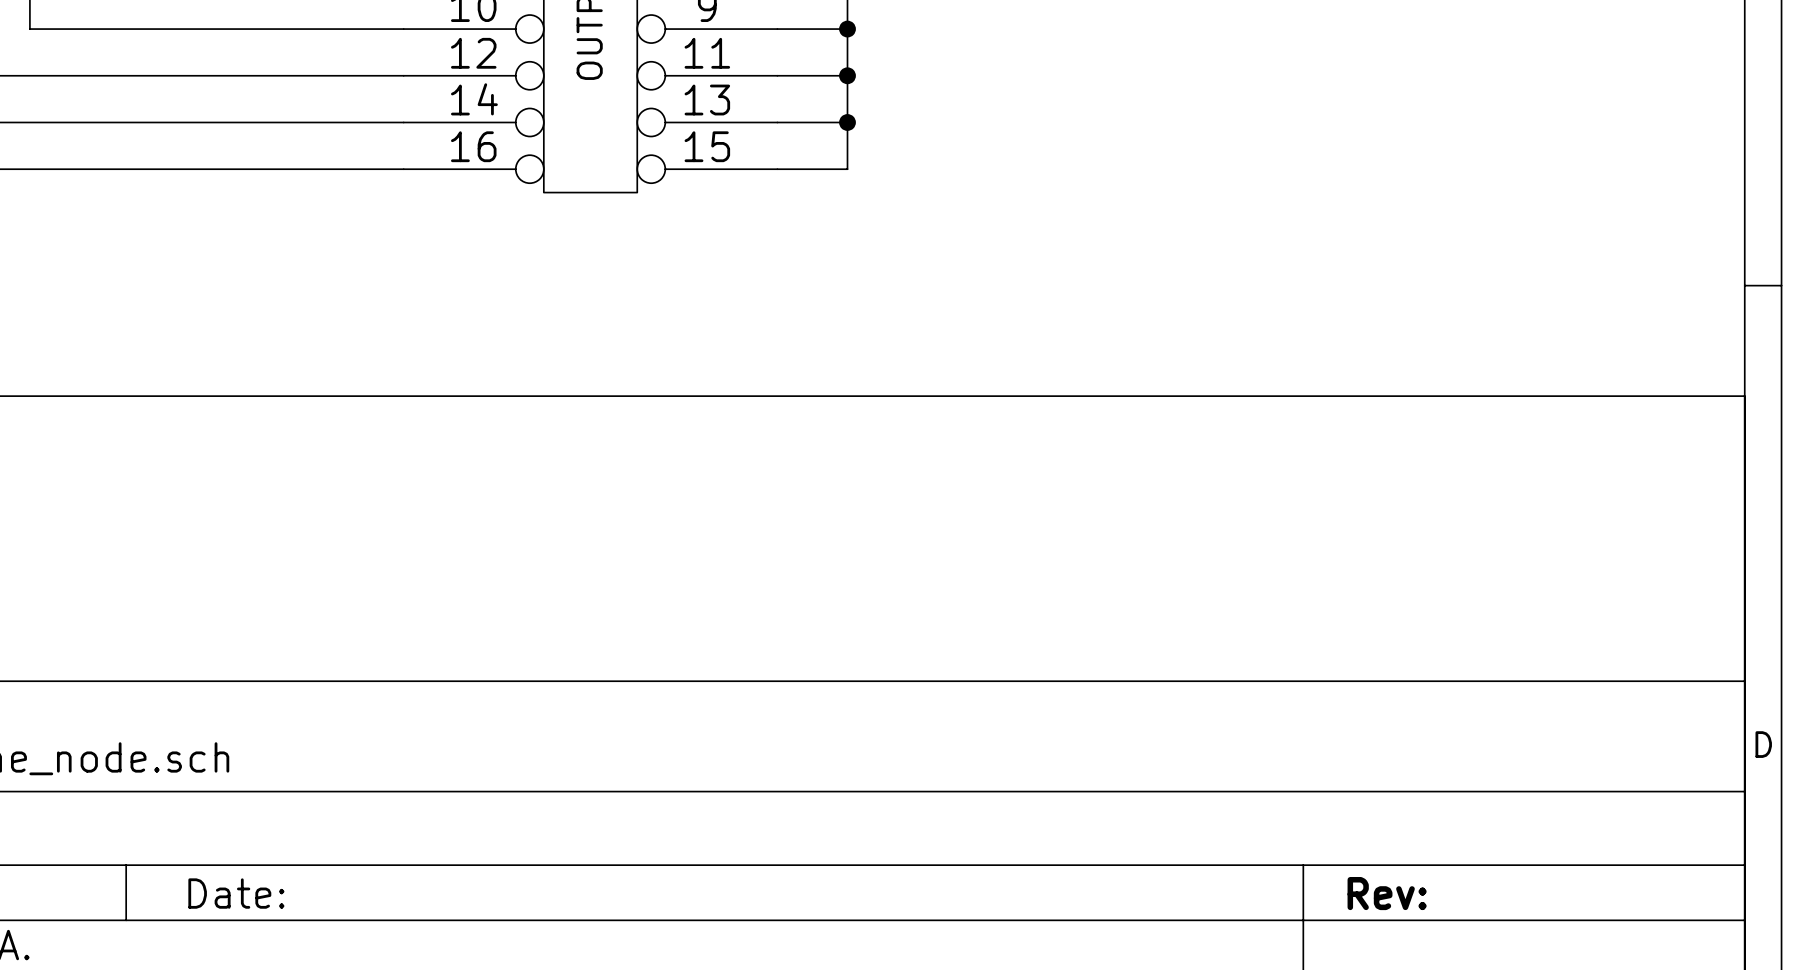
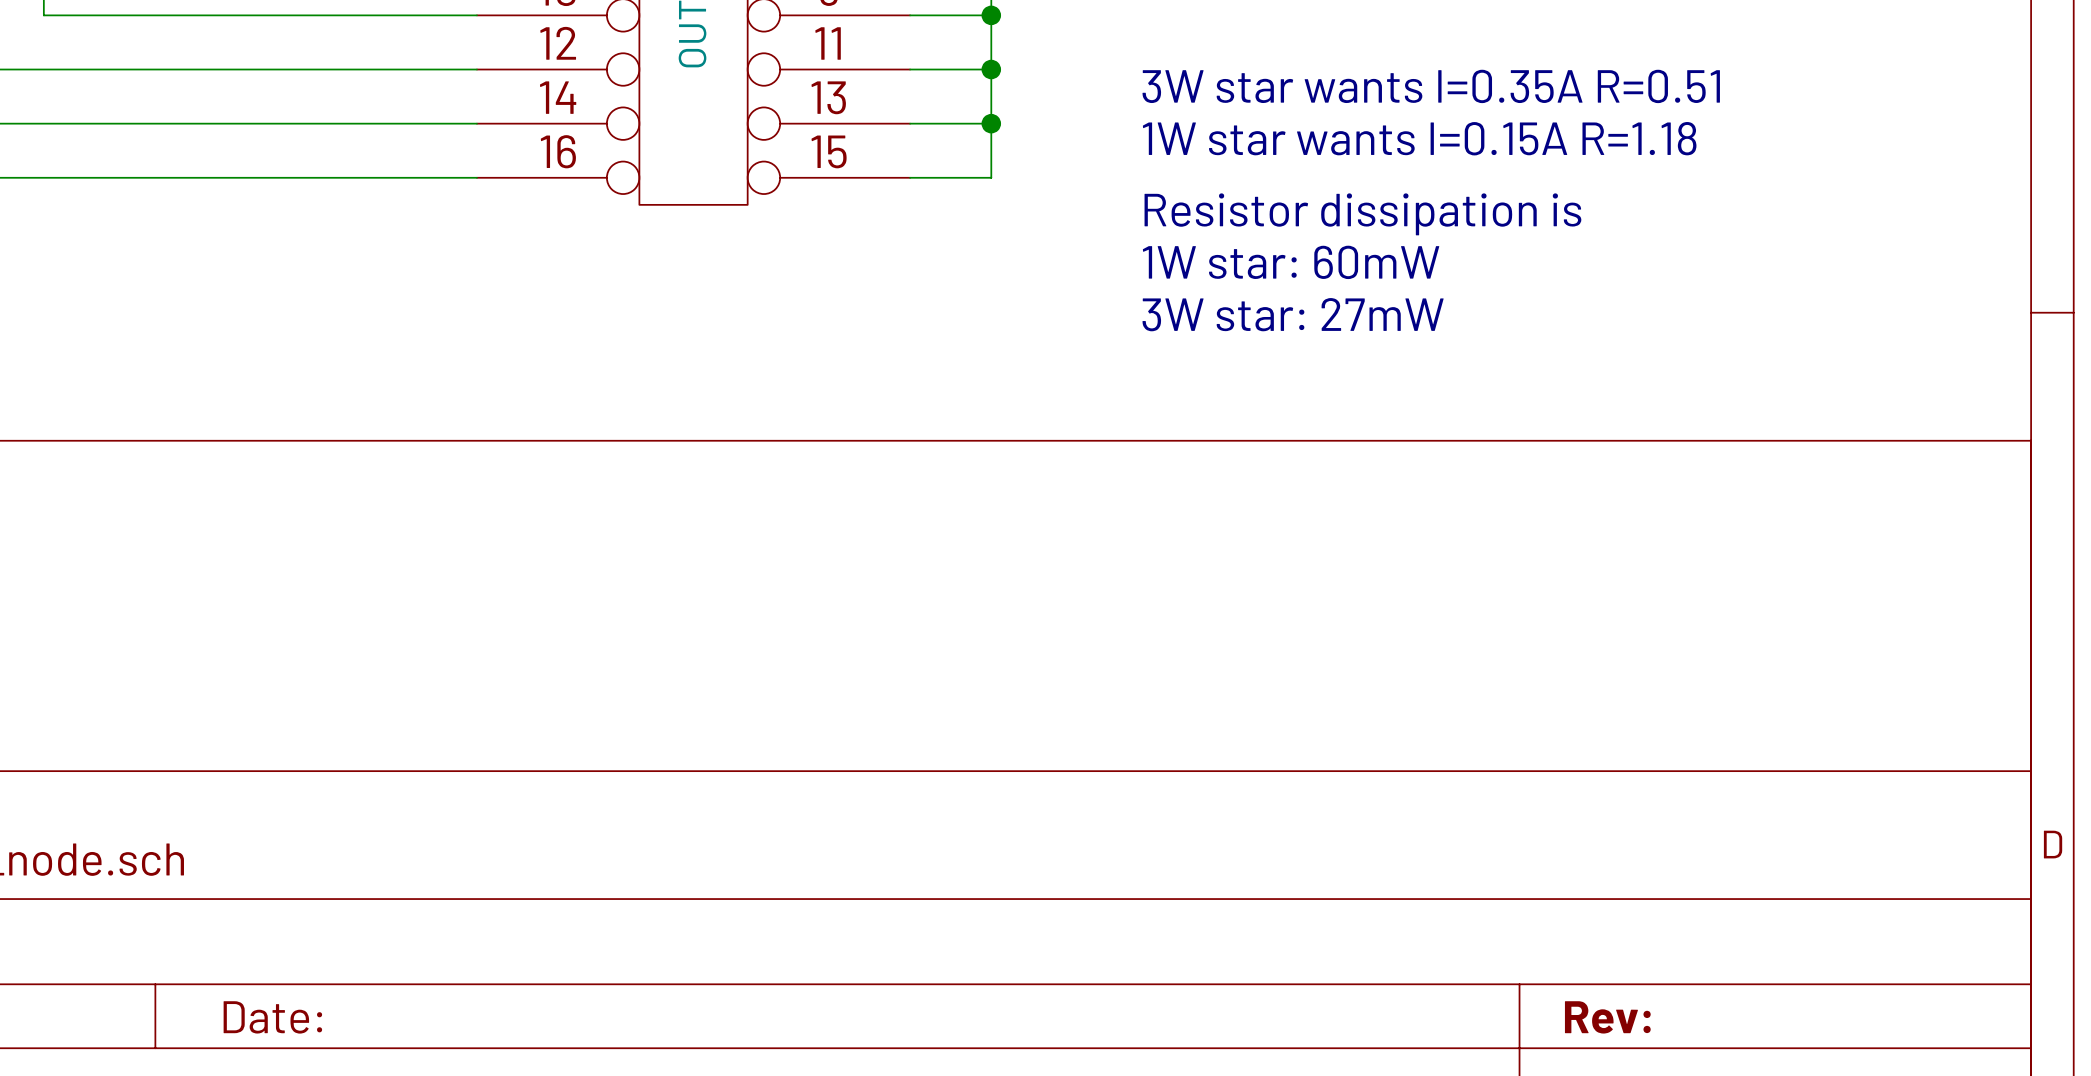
text: none -> 3W star wants I=0.35A R=0.51 (1431, 86)
text: none -> 1W star wants I=0.15A R=1.18 (1419, 138)
text: none -> Resistor dissipation is (1362, 214)
text: none -> 1W star: 60mW (1291, 262)
text: none -> 3W star: 27mW (1293, 314)

